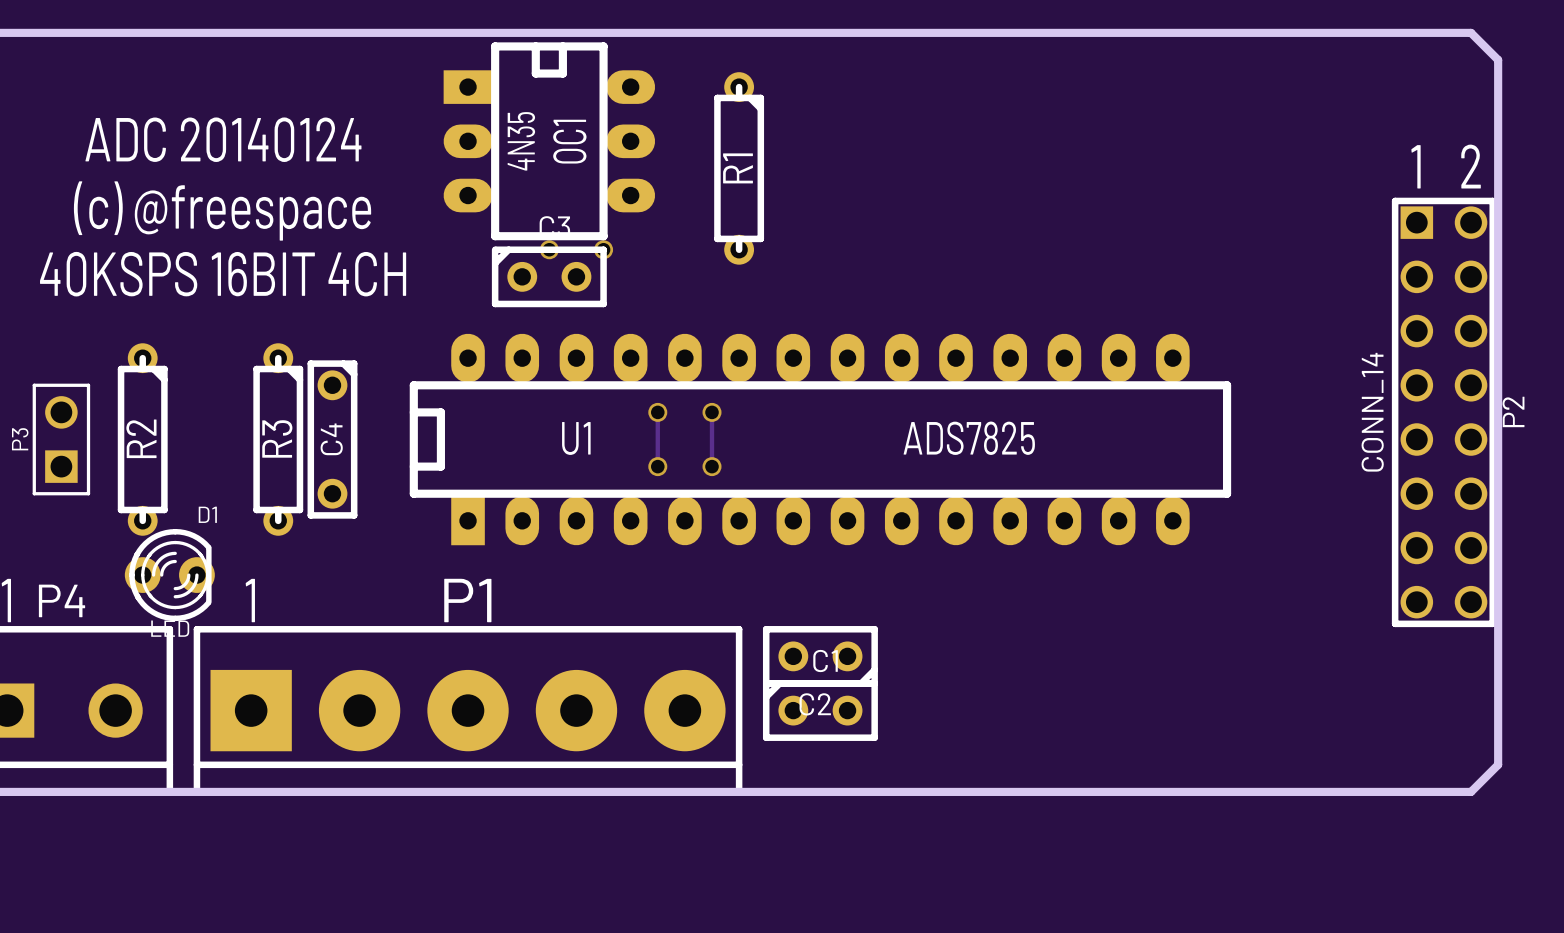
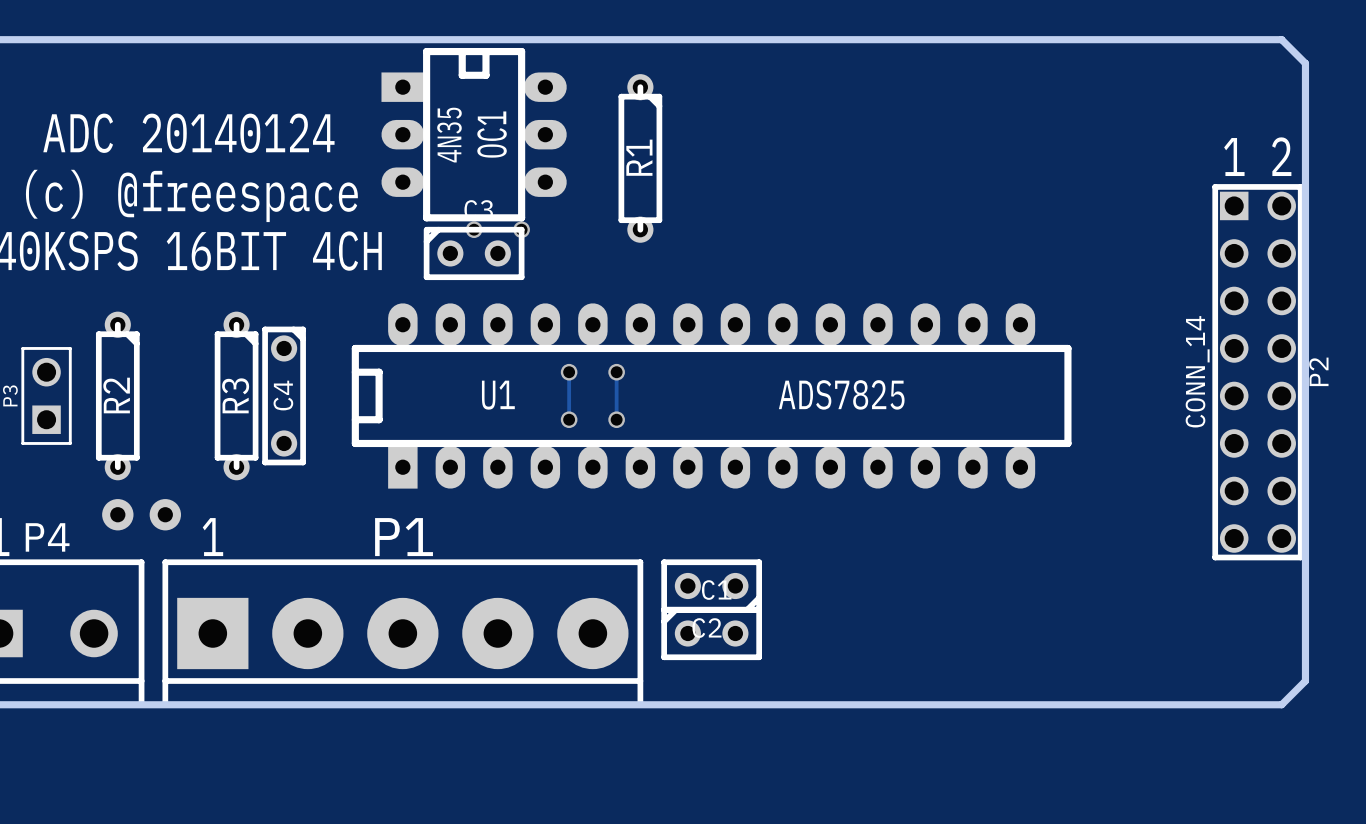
D1 side: top (169, 575) -> bottom (141, 514)

